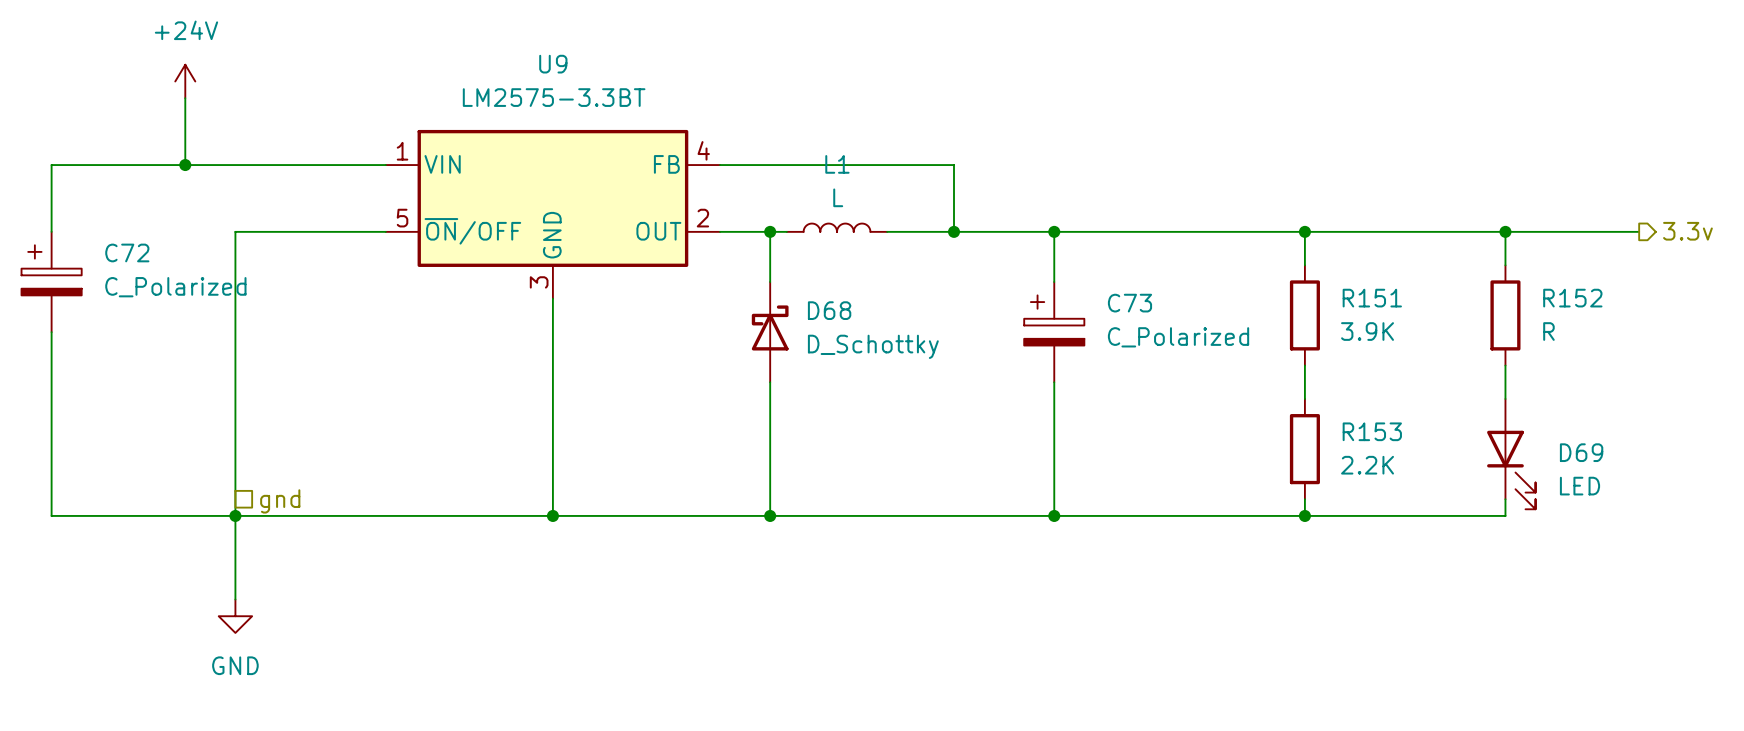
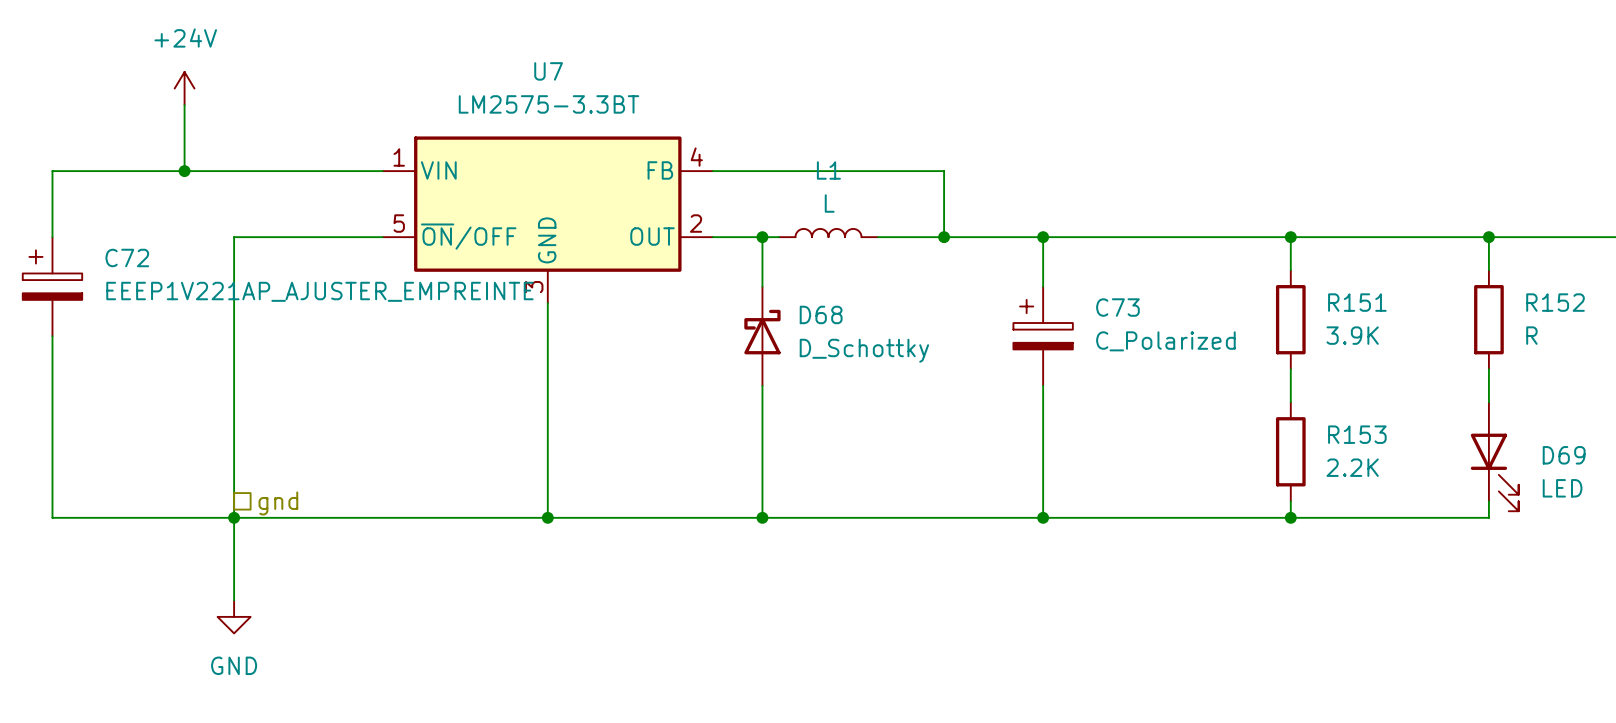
U9 name: U9 (553, 64) -> U7 (548, 71)
C72 value: C_Polarized (175, 287) -> EEEP1V221AP_AJUSTER_EMPREINTE (319, 291)

